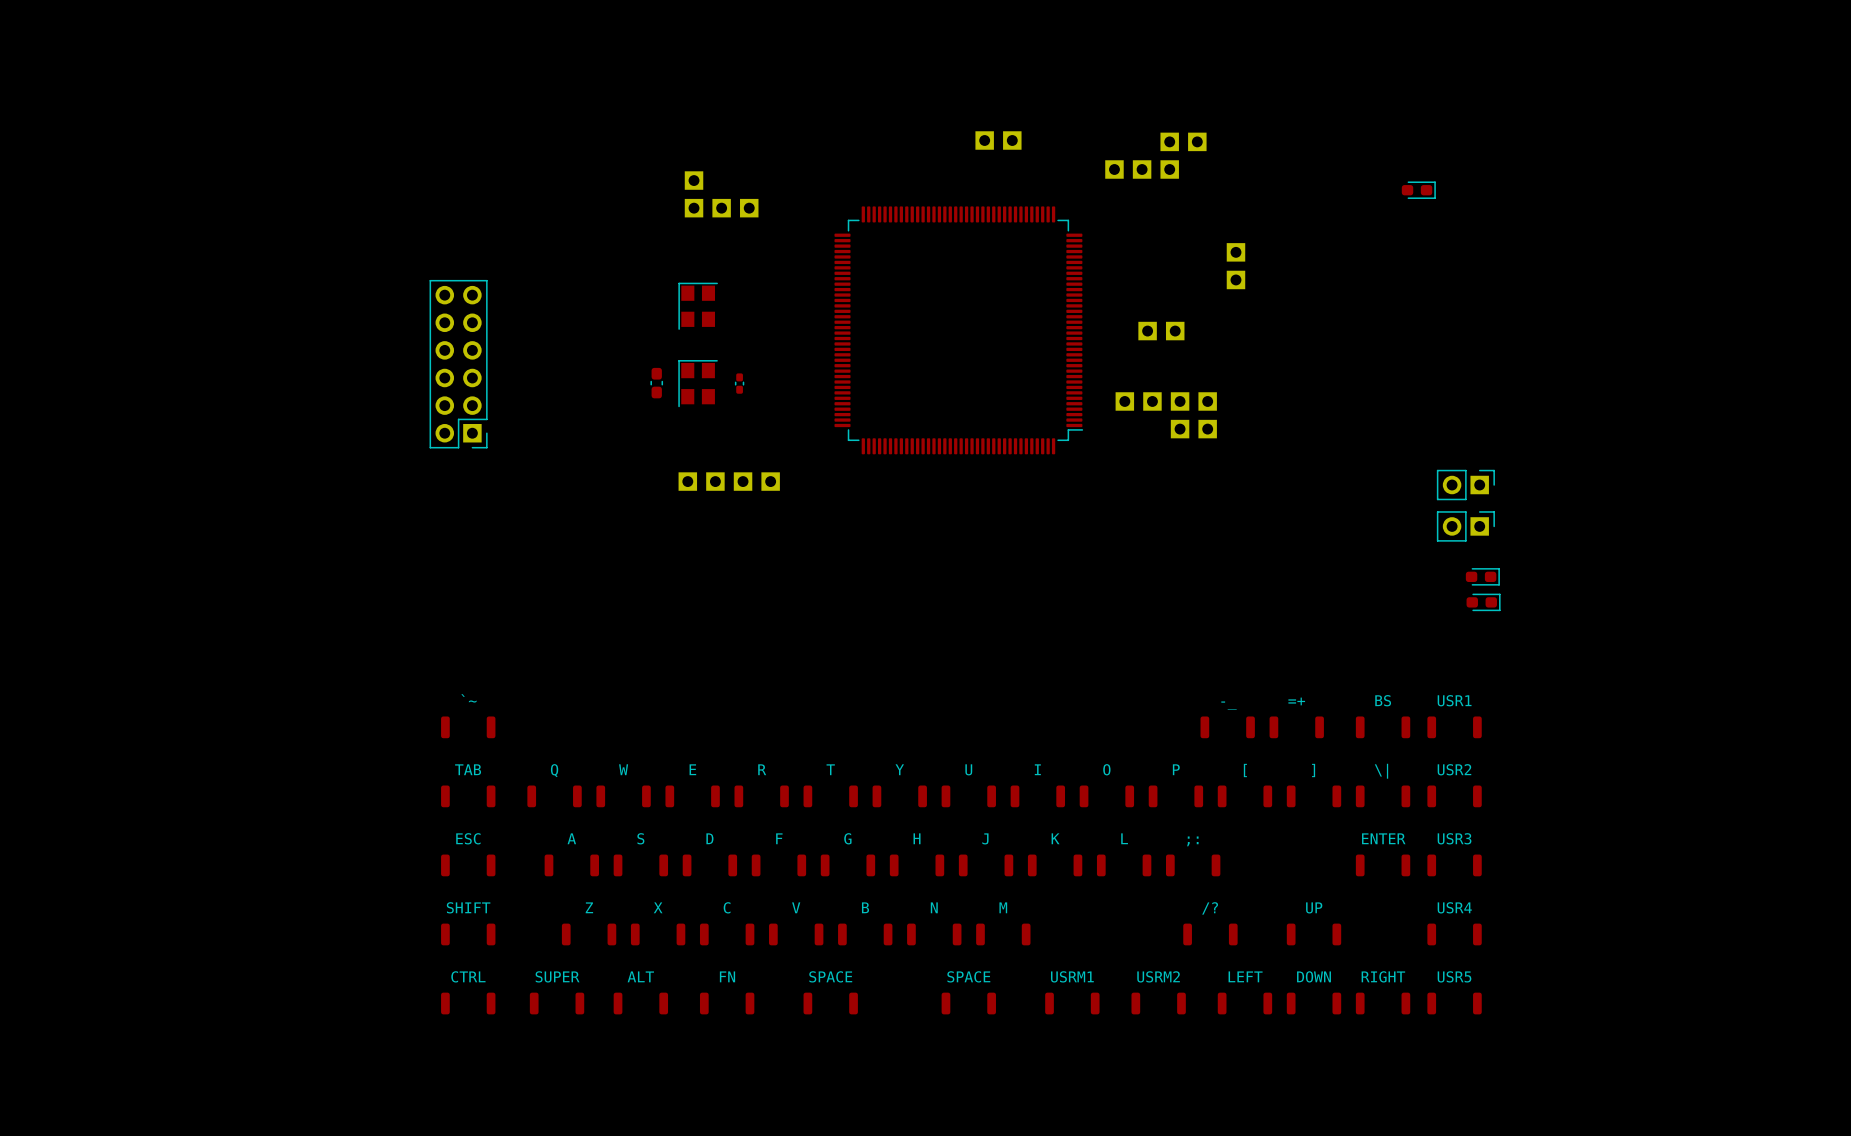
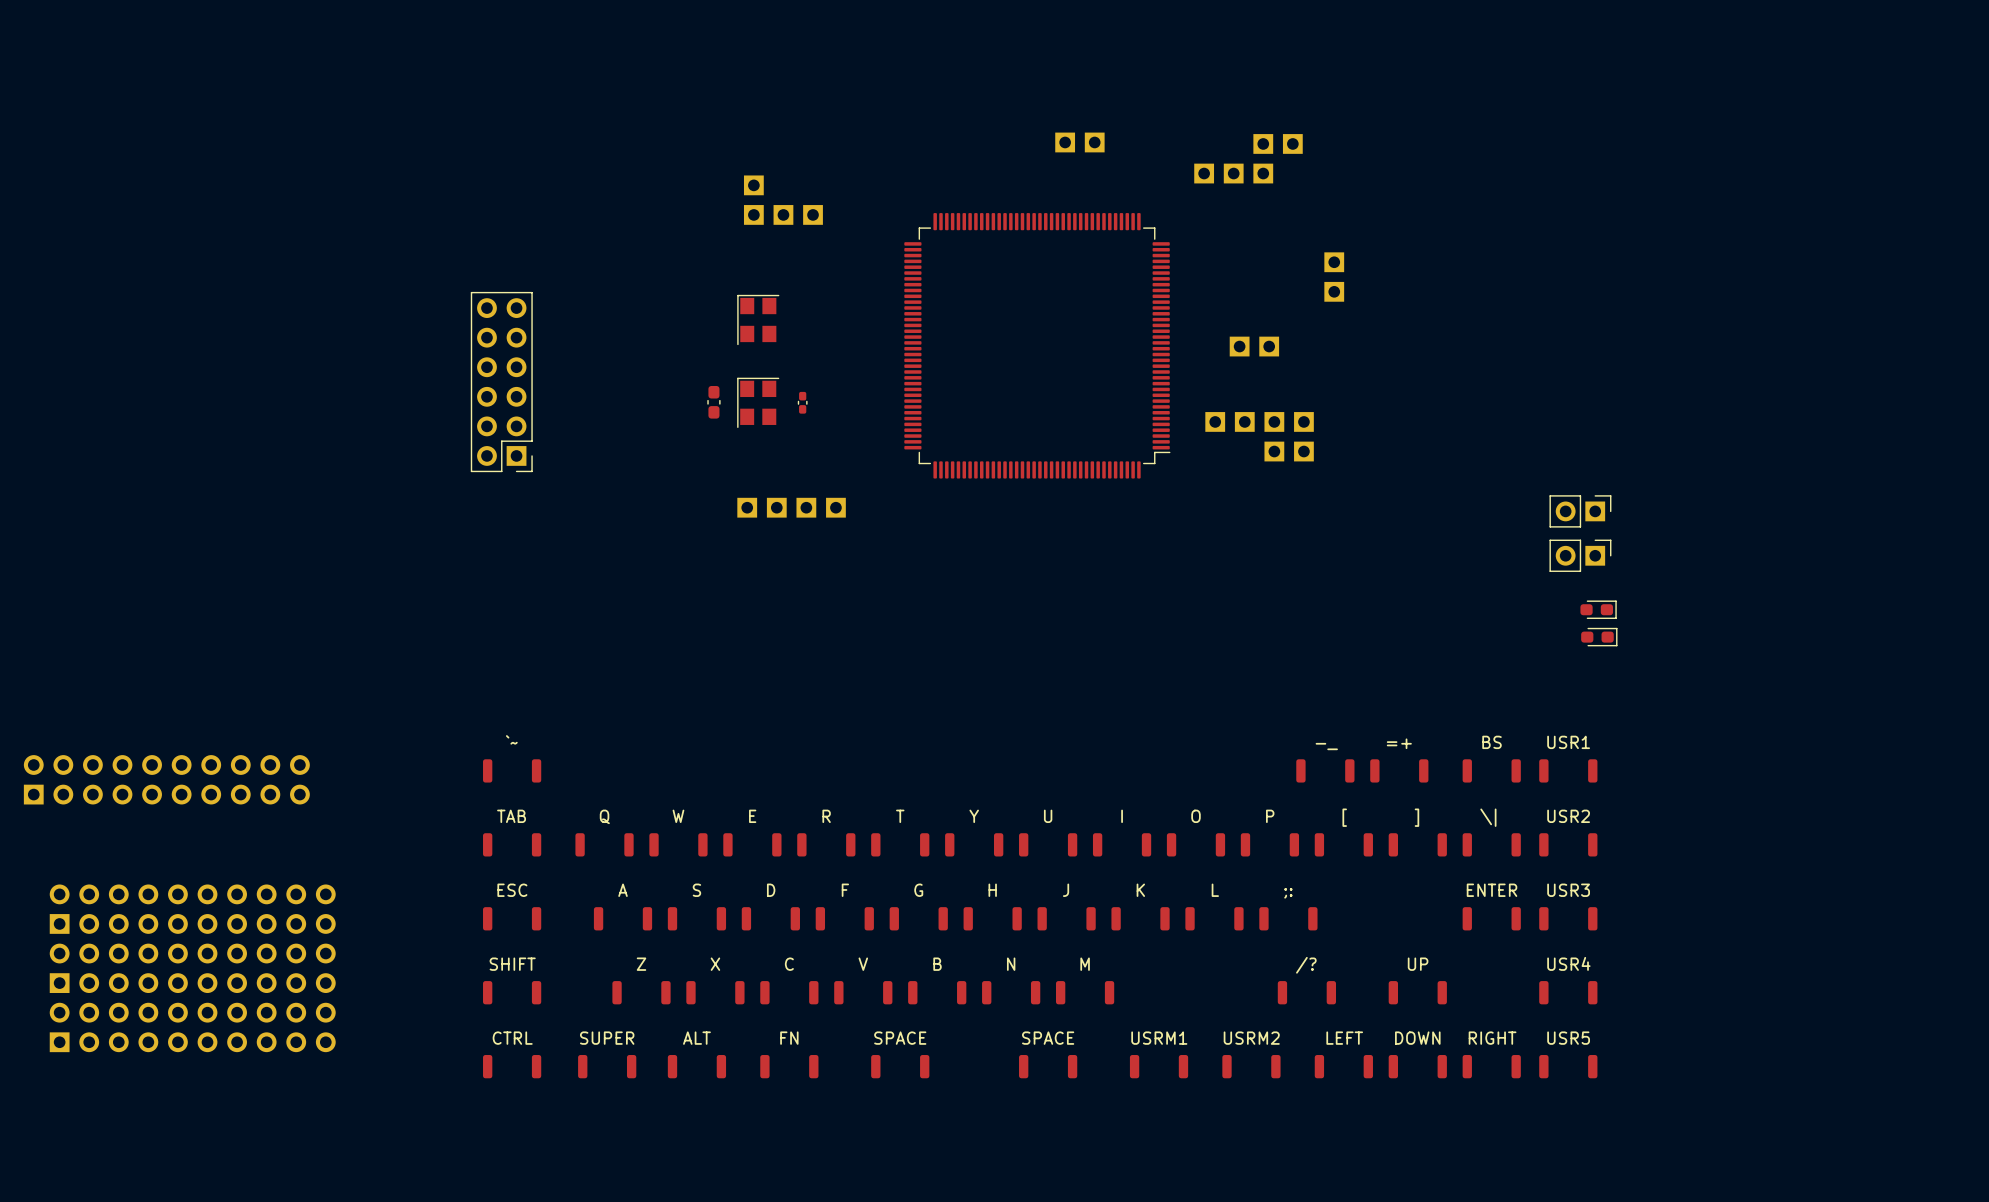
part: (1418, 190) -> none
part: none -> (166, 779)
part: none -> (192, 909)
part: none -> (192, 968)
part: none -> (192, 1027)

